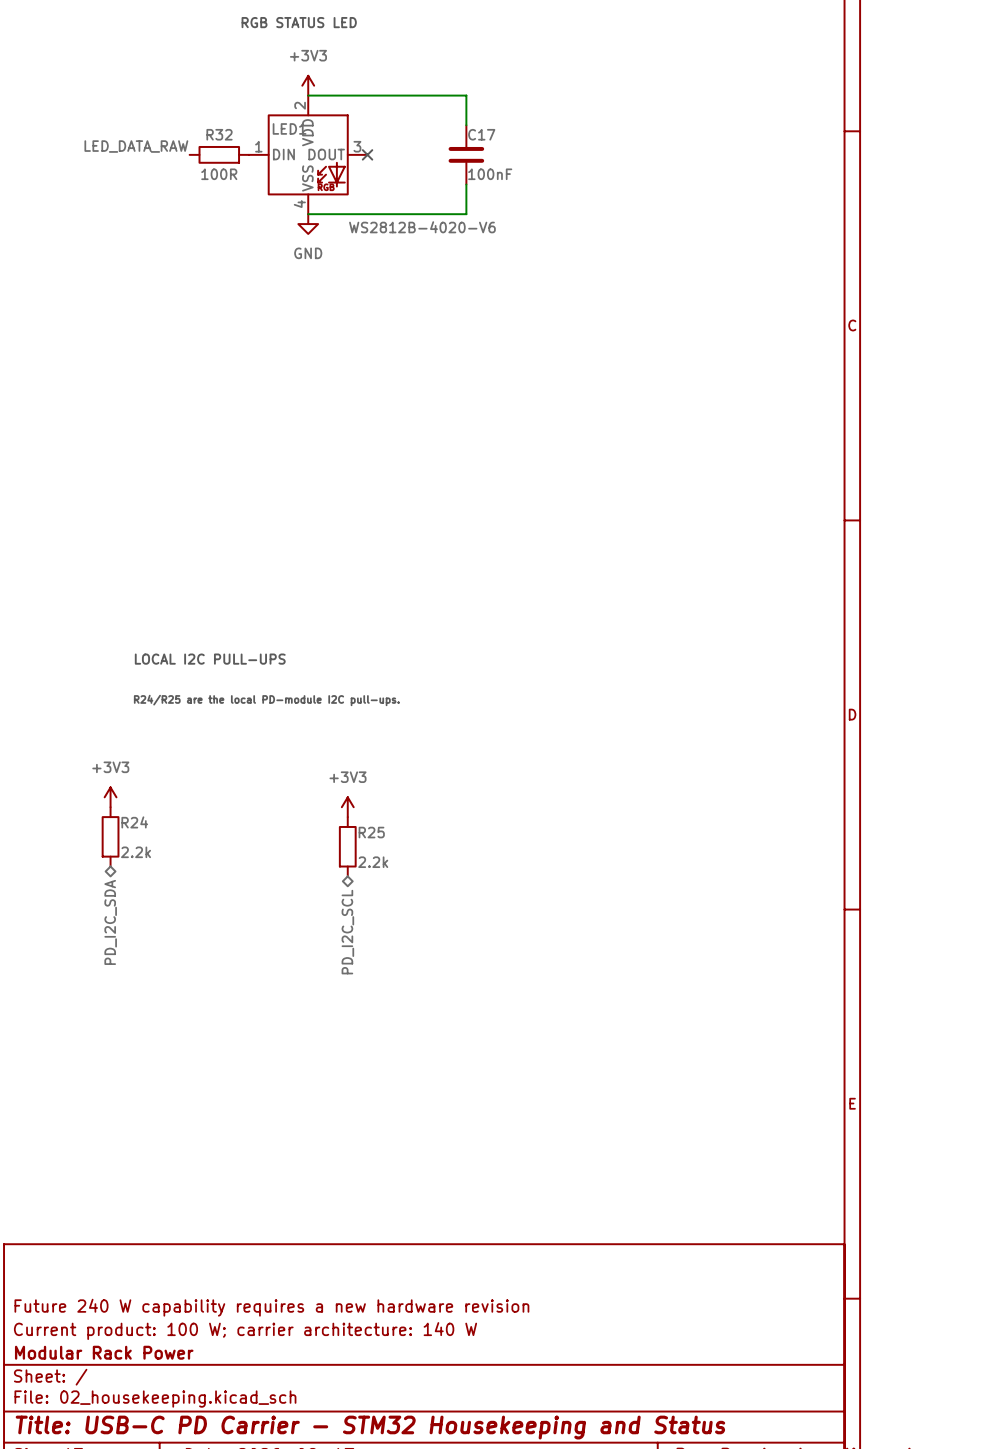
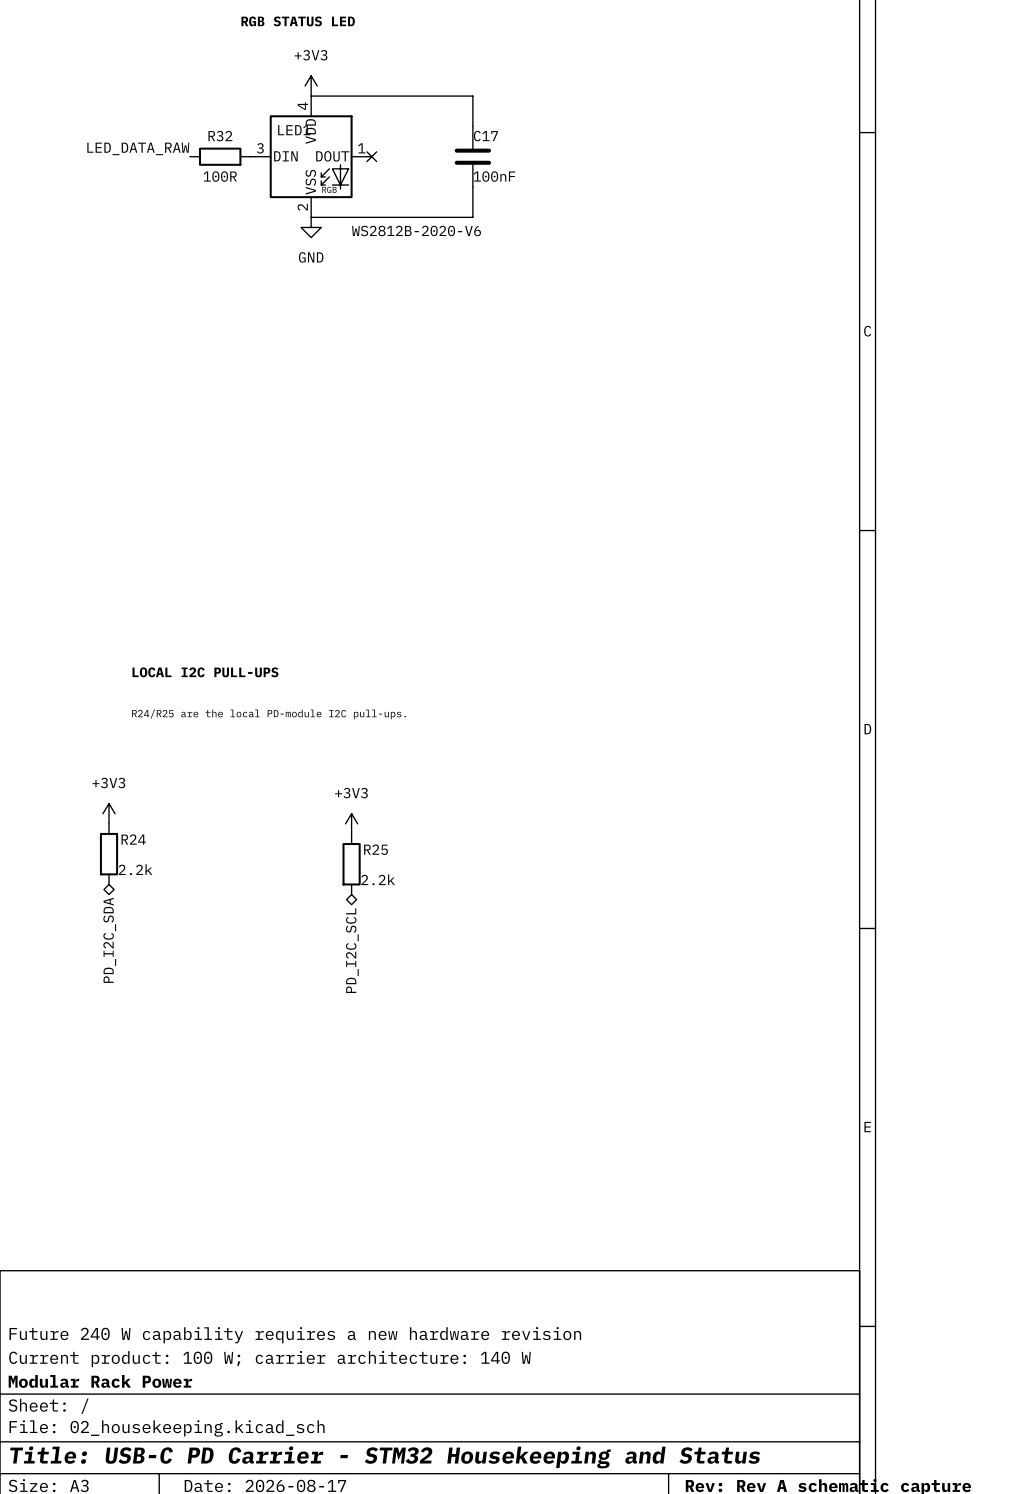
LED1 pin number: 2 (300, 105) -> 4 (302, 106)
LED1 pin number: 1 (258, 146) -> 3 (260, 148)
LED1 pin number: 3 (357, 146) -> 1 (361, 148)
LED1 pin number: 4 (299, 204) -> 2 (302, 207)
LED1 value: WS2812B-4020-V6 (422, 227) -> WS2812B-2020-V6 (416, 230)

